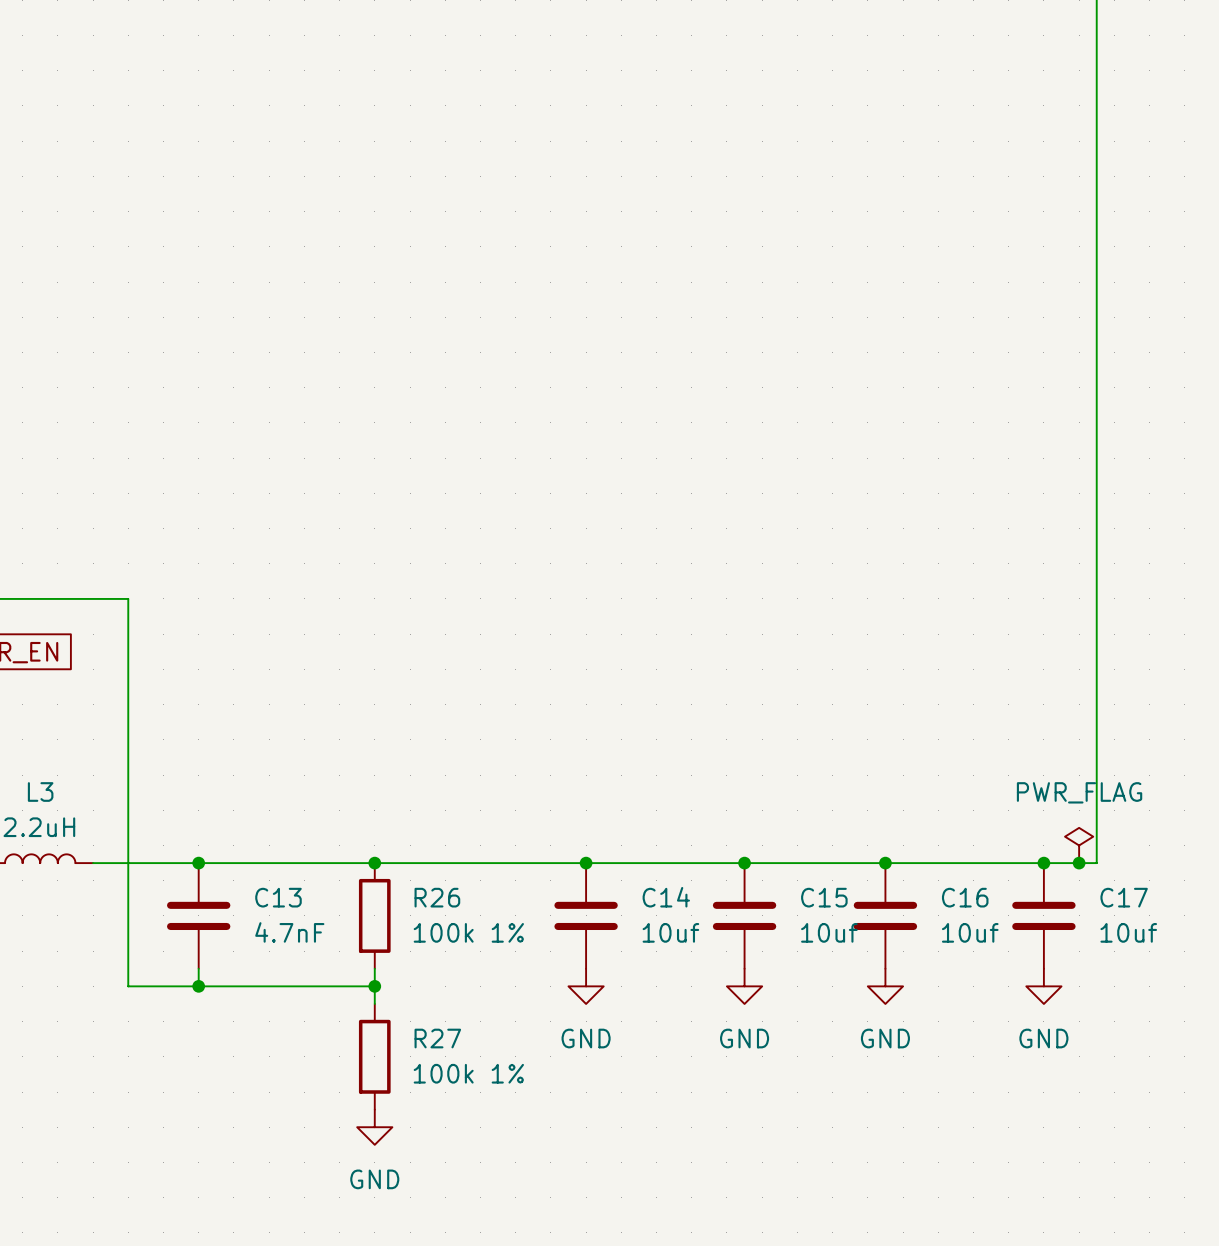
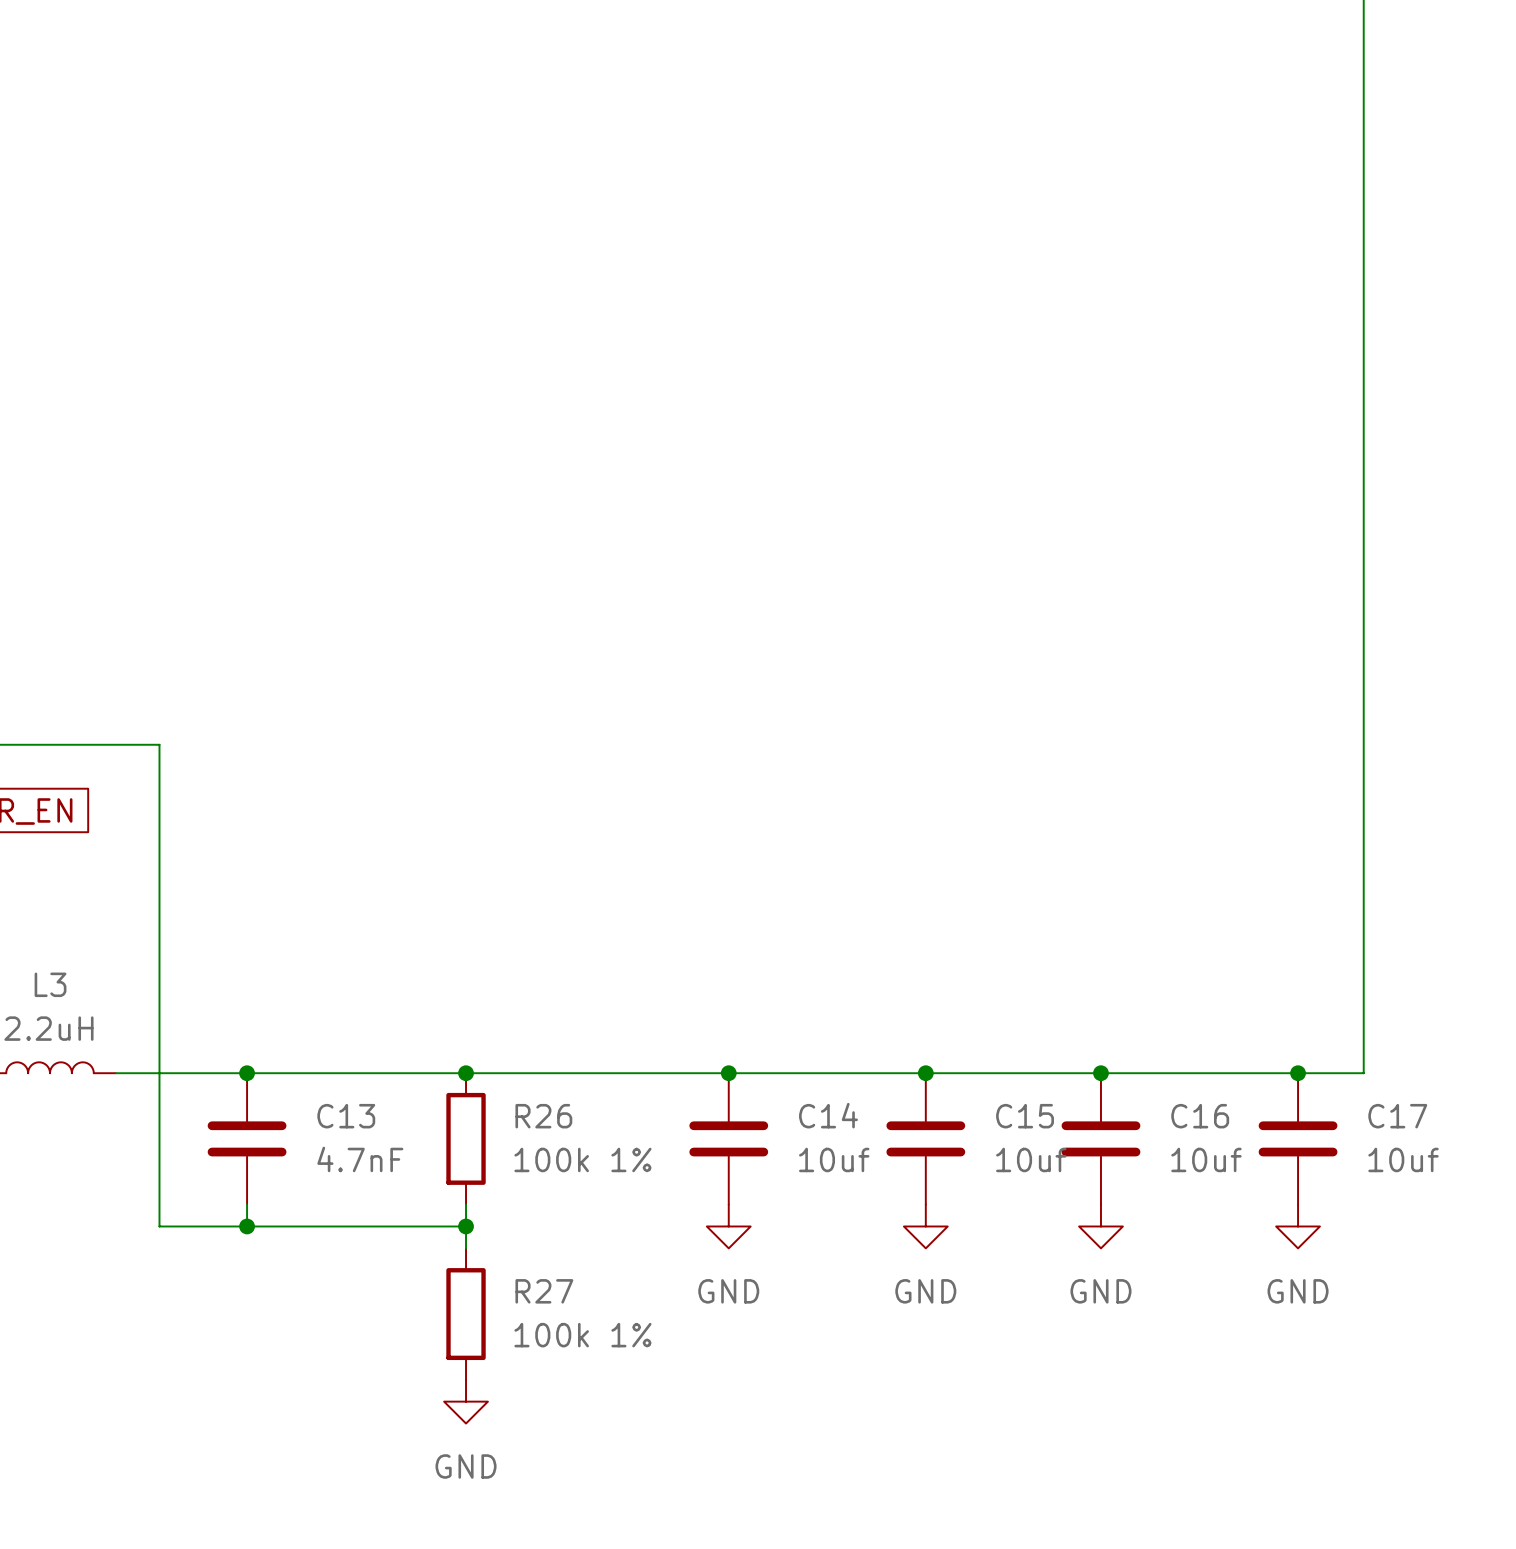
power symbol: PWR_FLAG (1079, 845) -> none
junction: (1079, 863) -> none

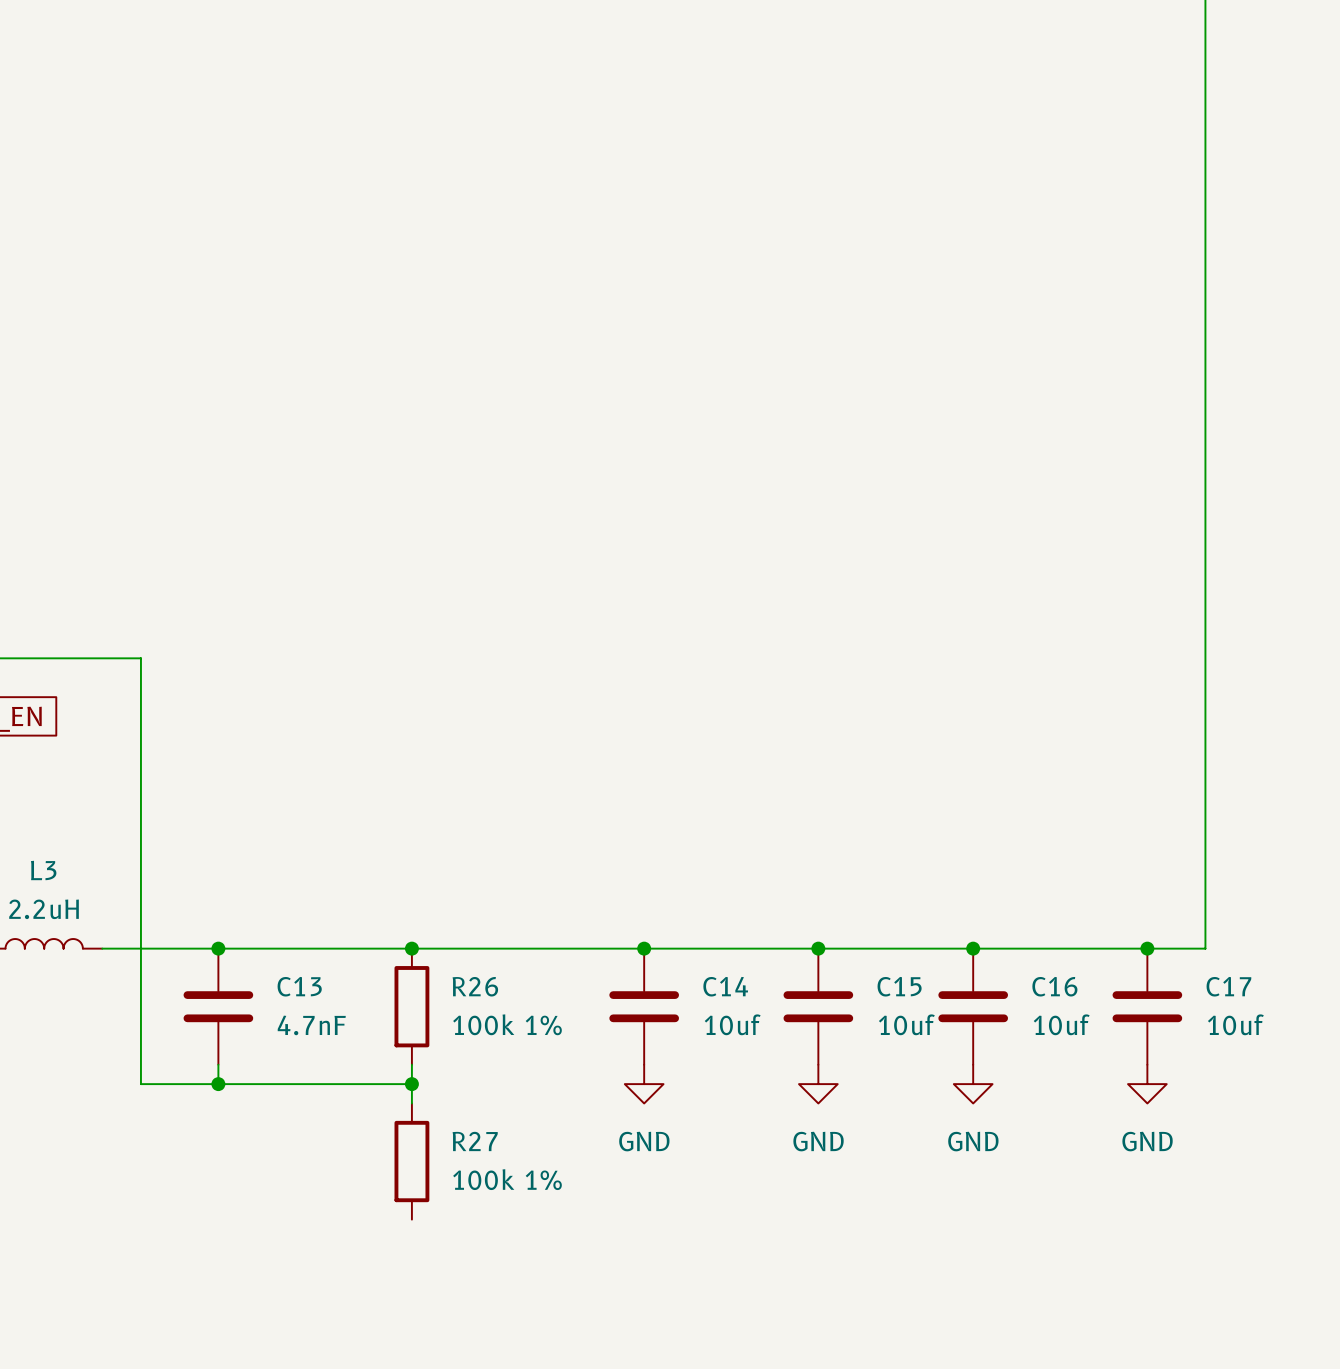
power symbol: GND (466, 1401) -> none

